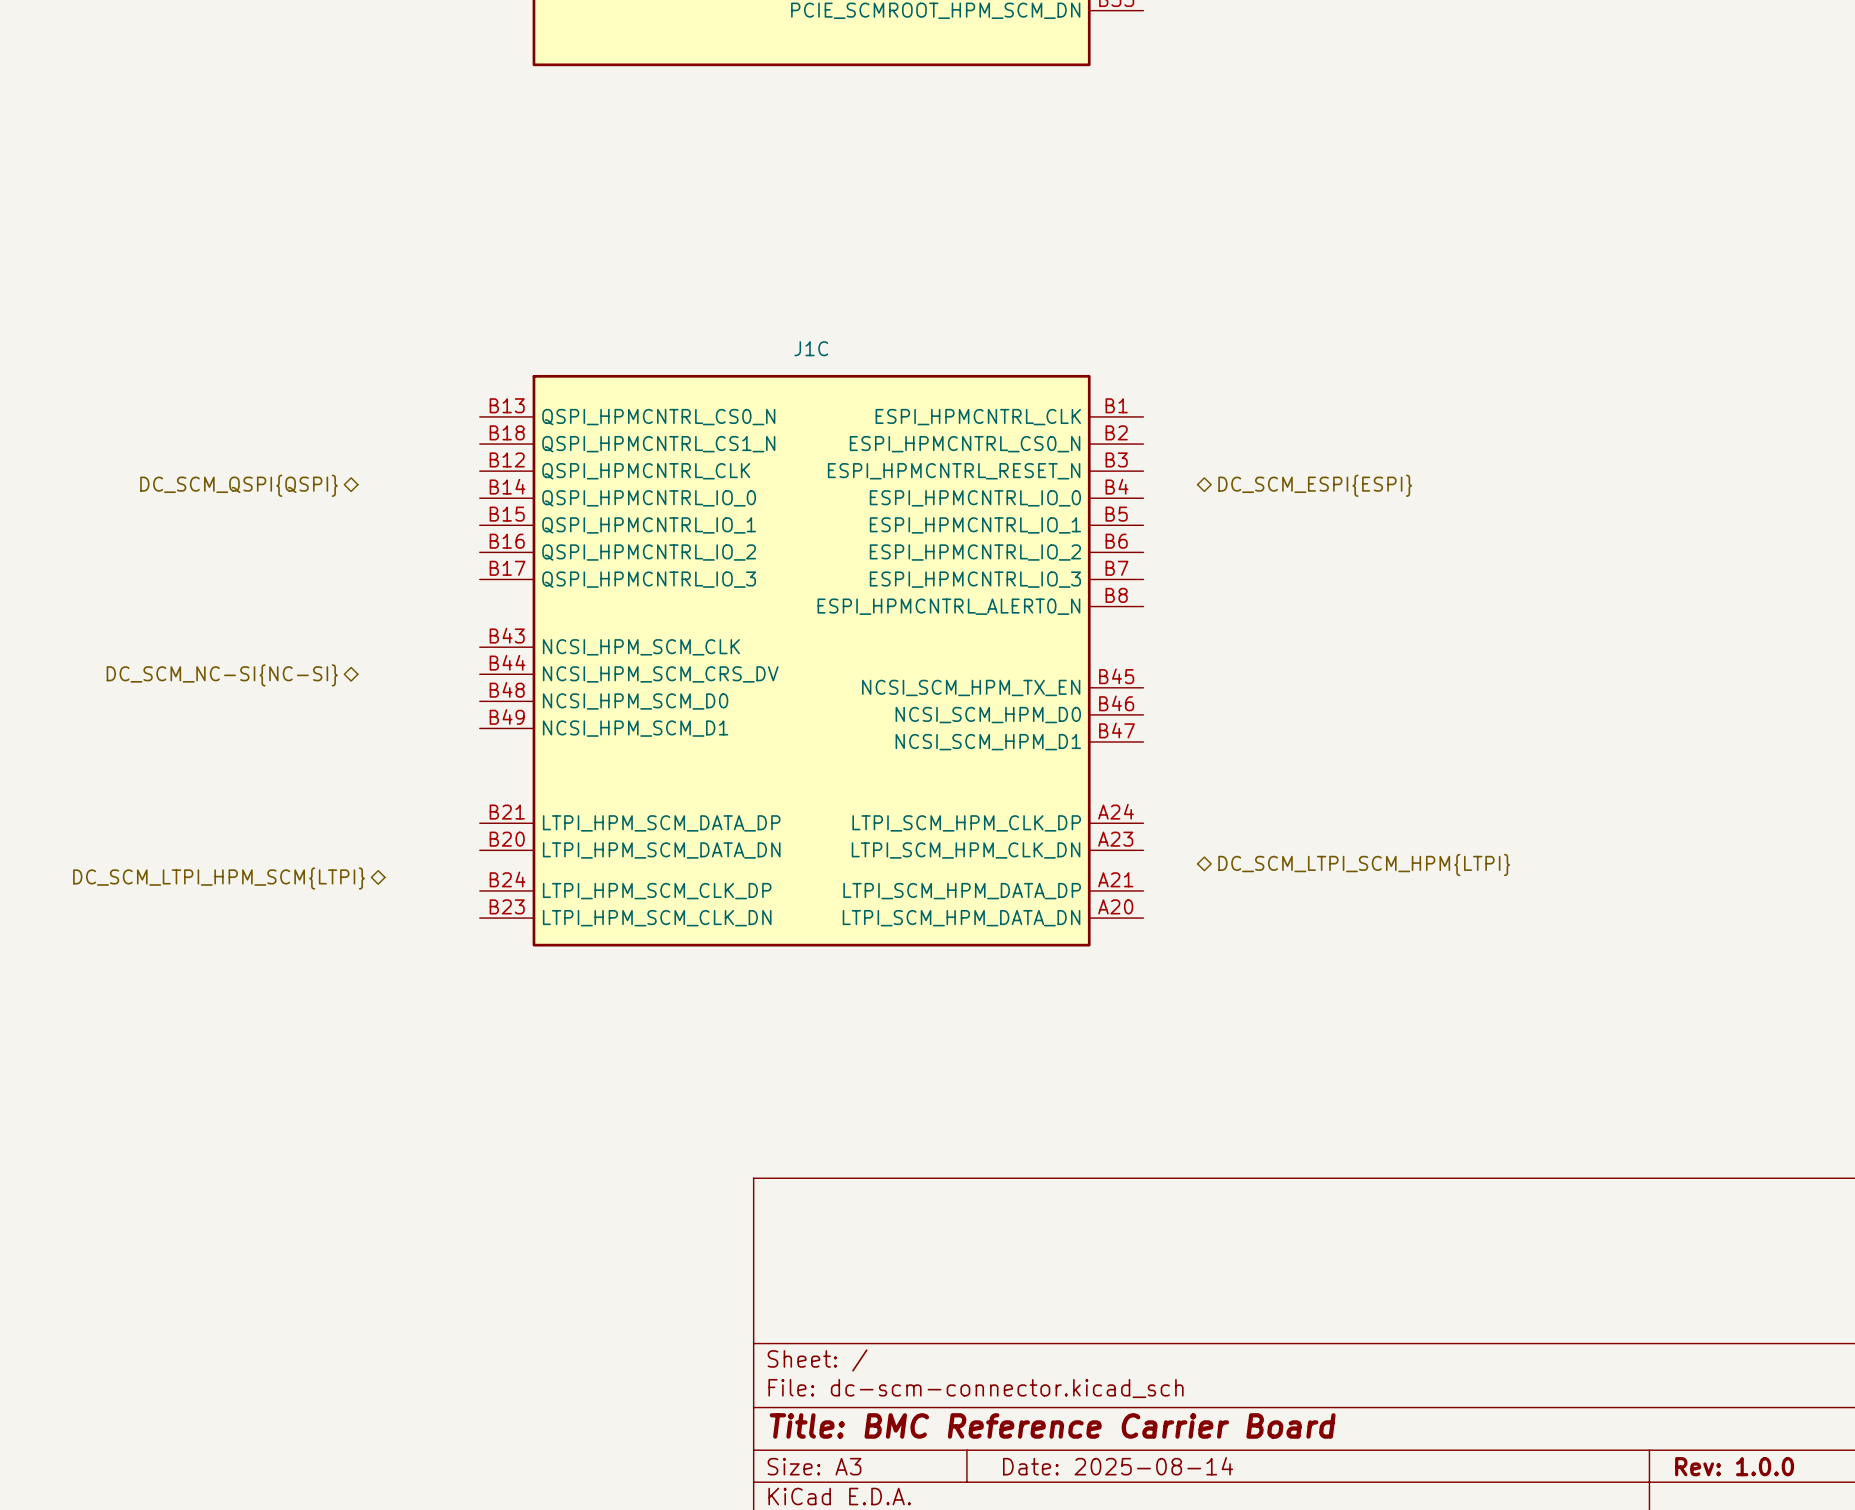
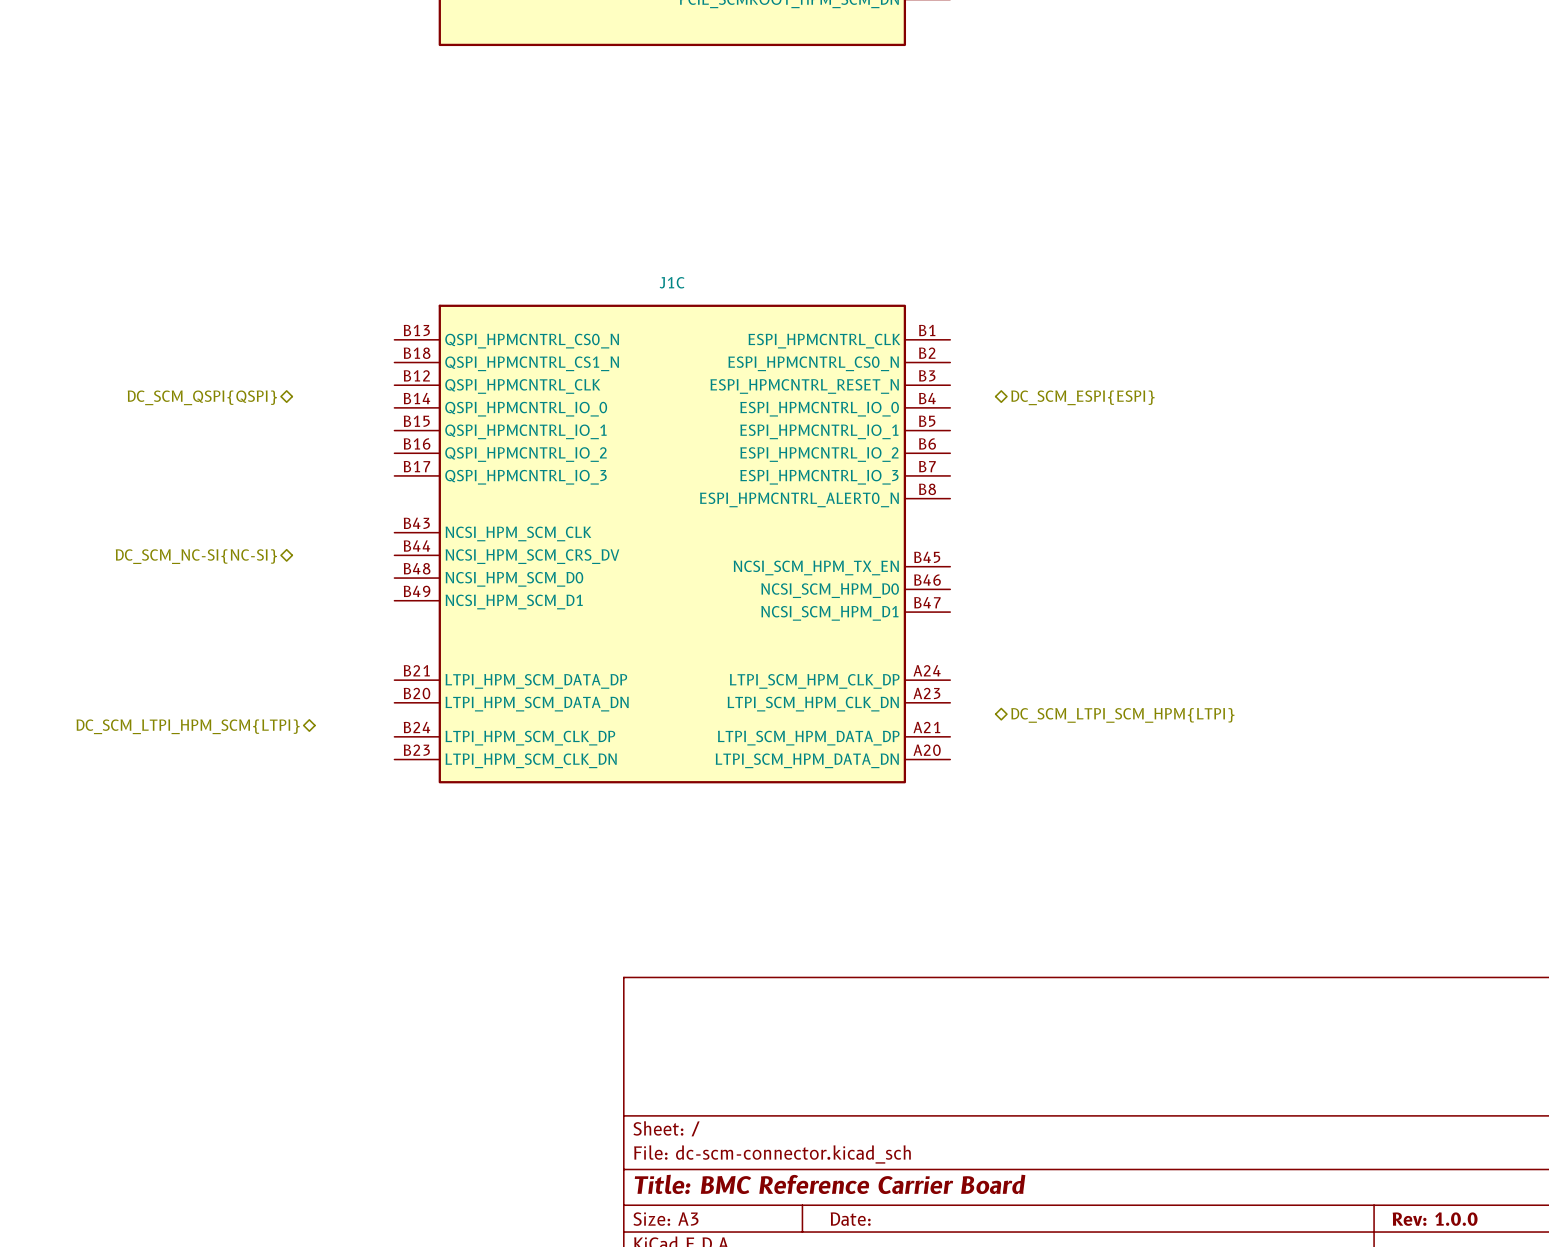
title block: Date: 2025-08-14 (1118, 1466) -> Date: (850, 1219)

